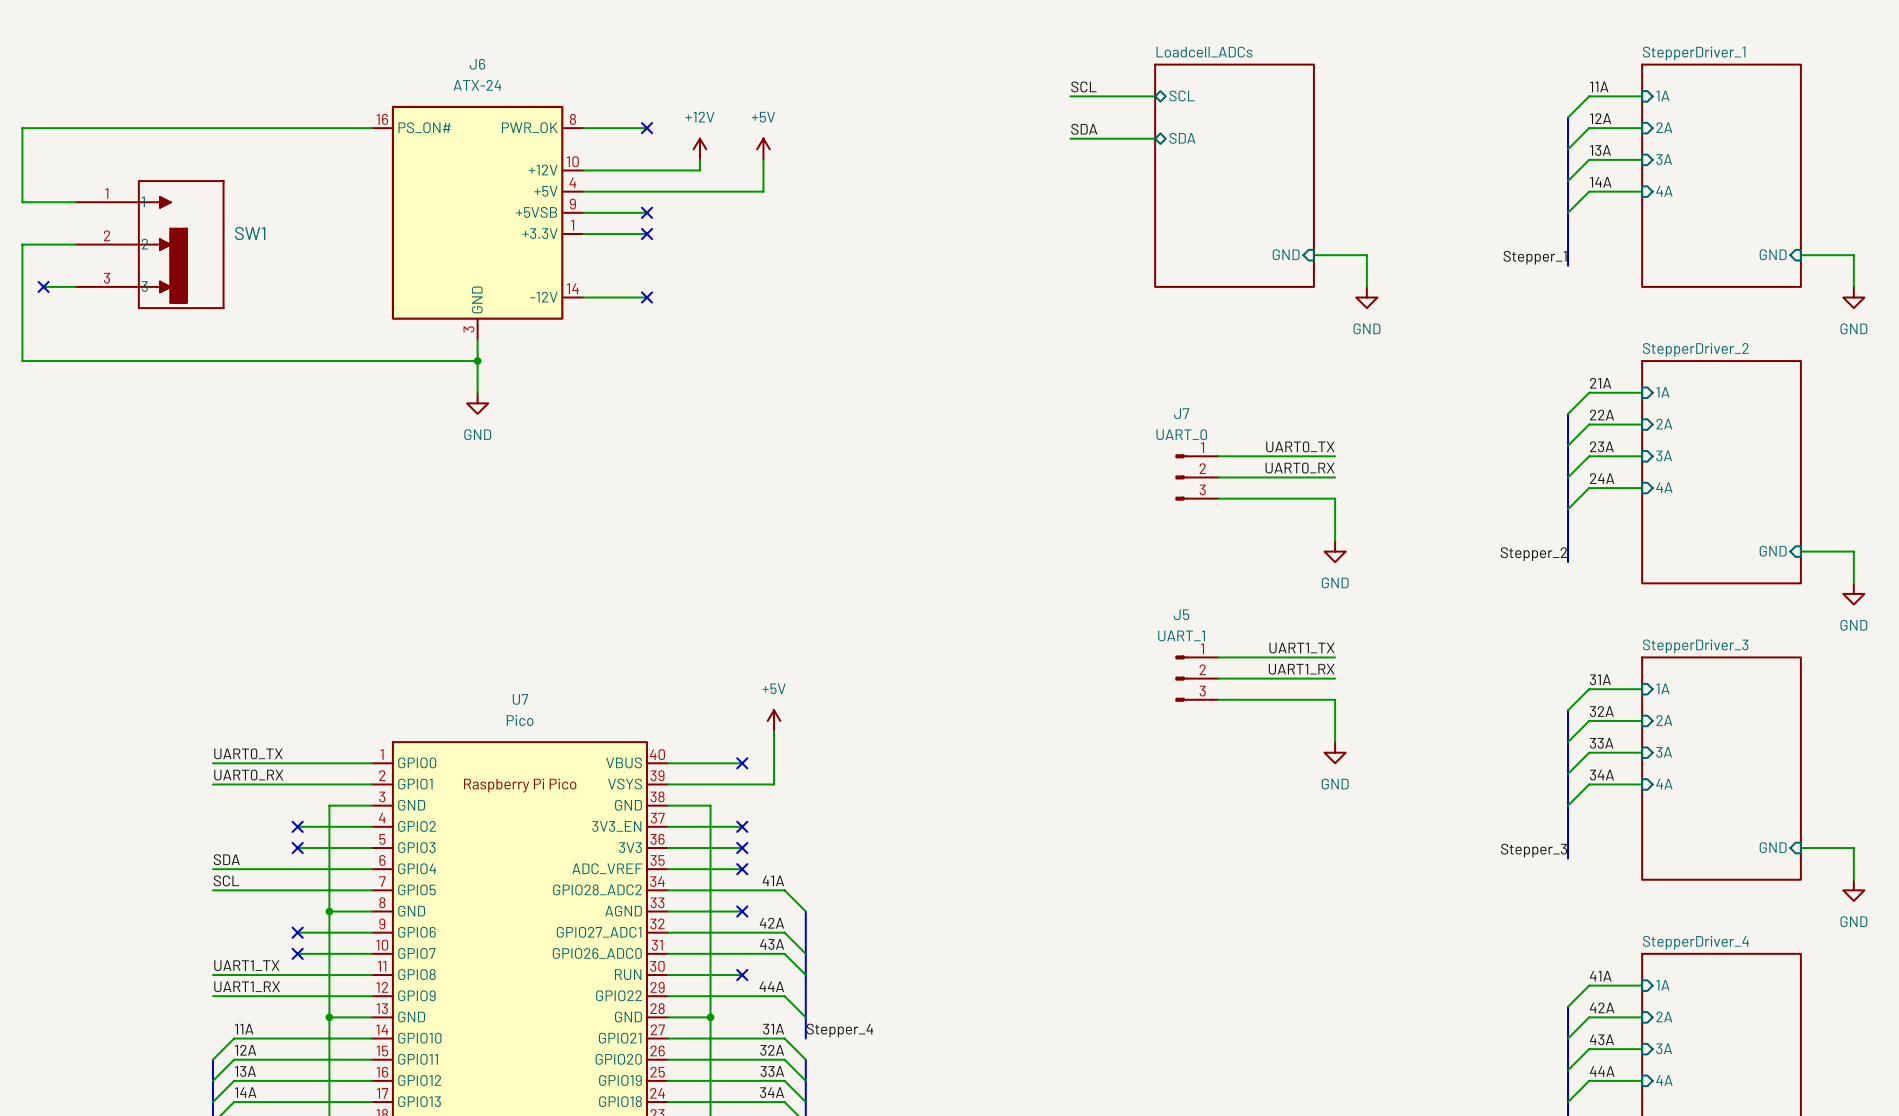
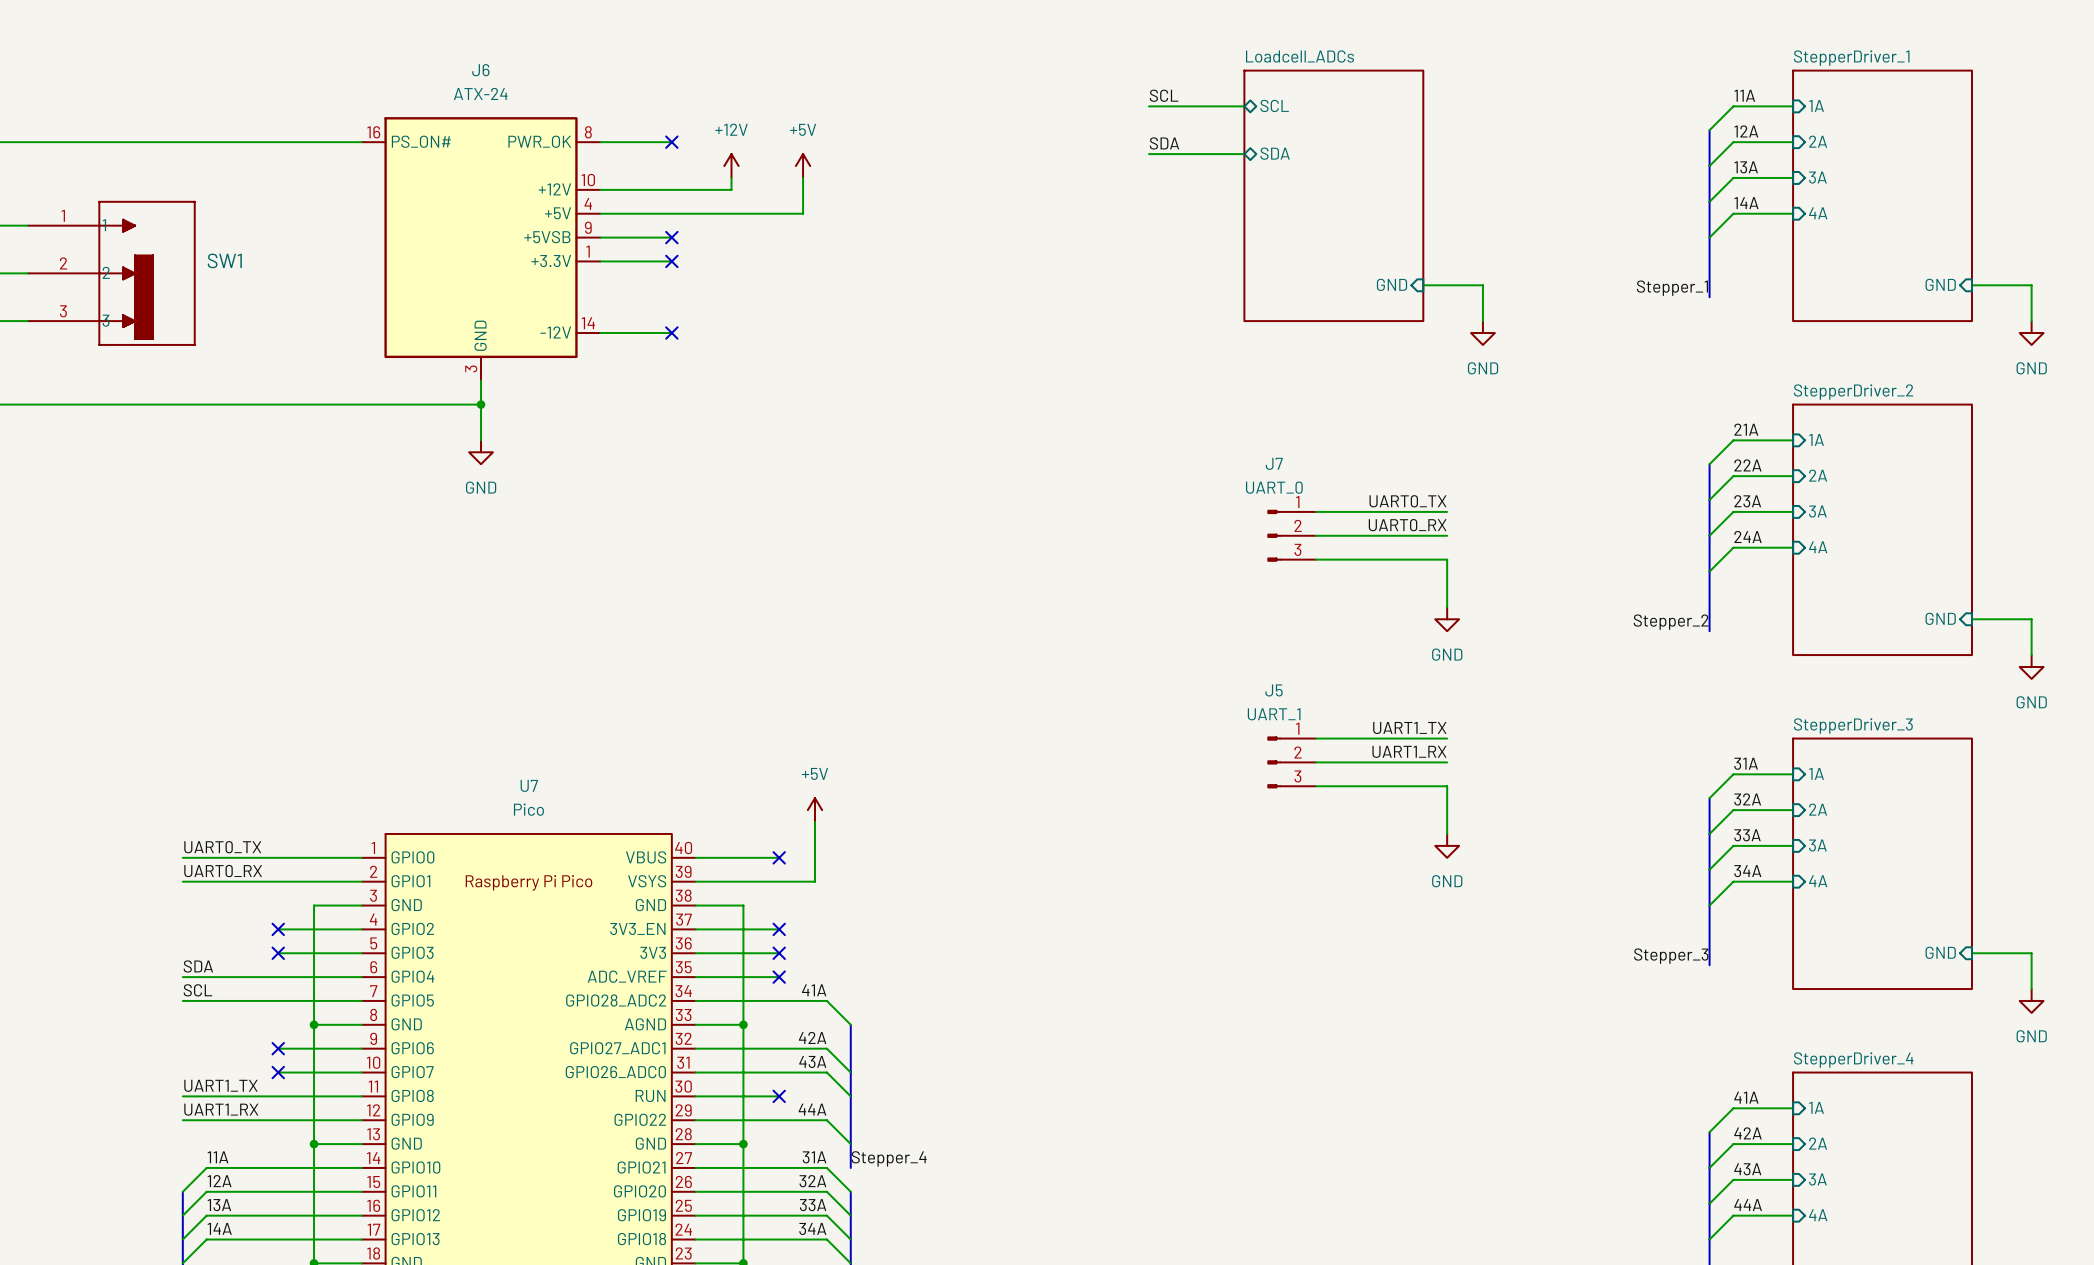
wire: (710, 911) (742, 911) -> none
junction: none -> (743, 1024)
no-connect mark: (742, 911) -> none

